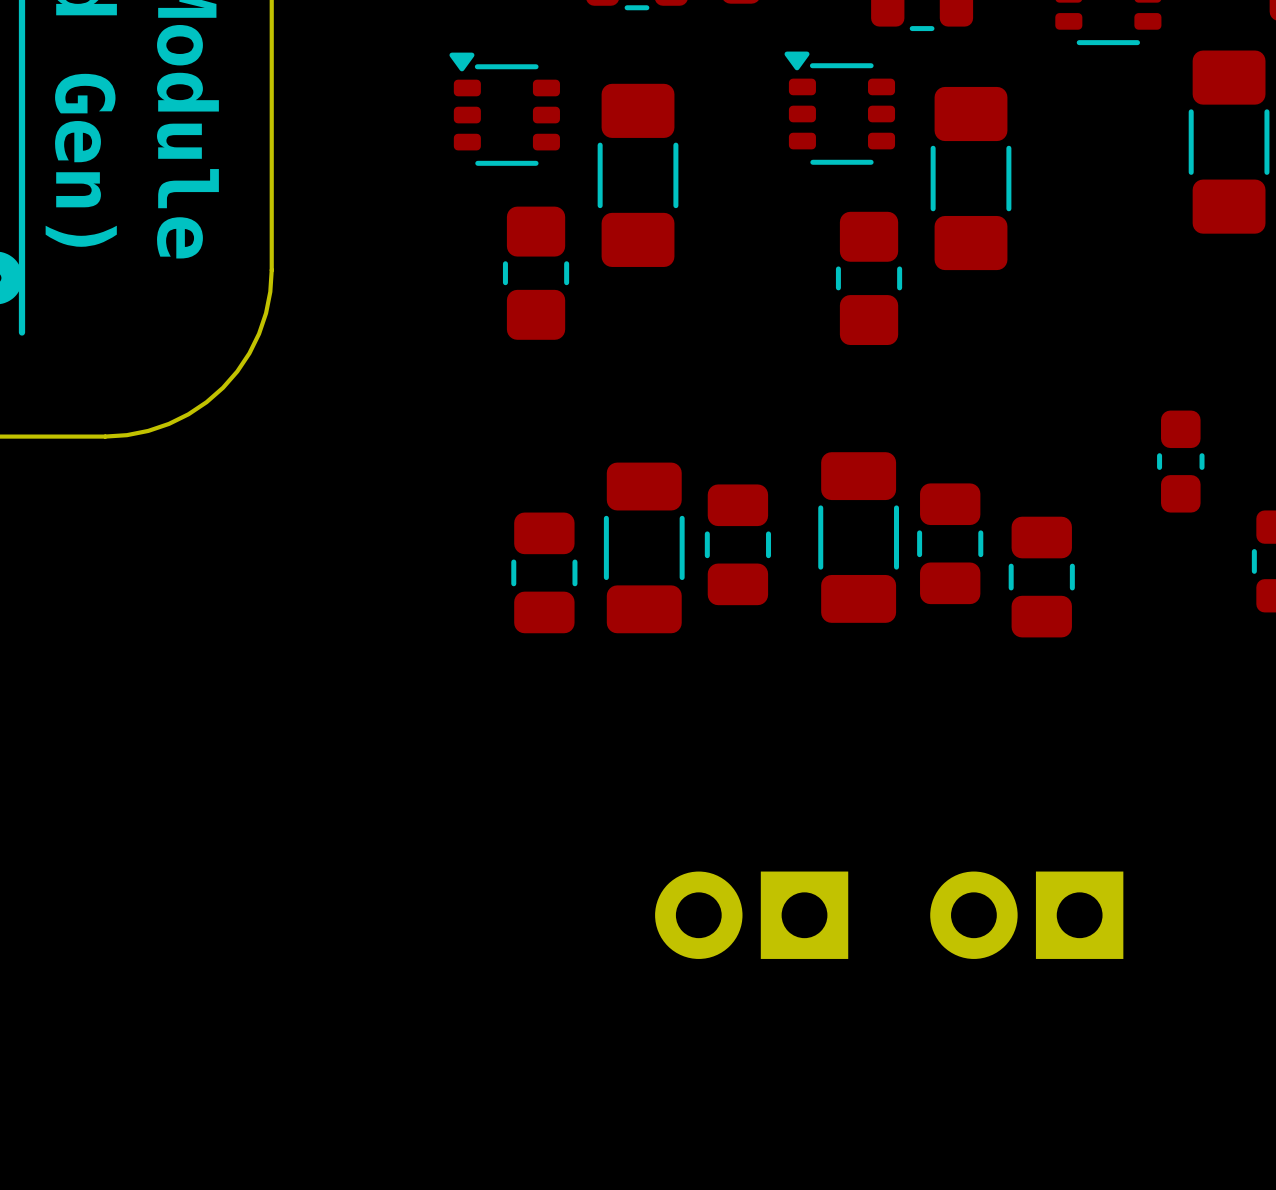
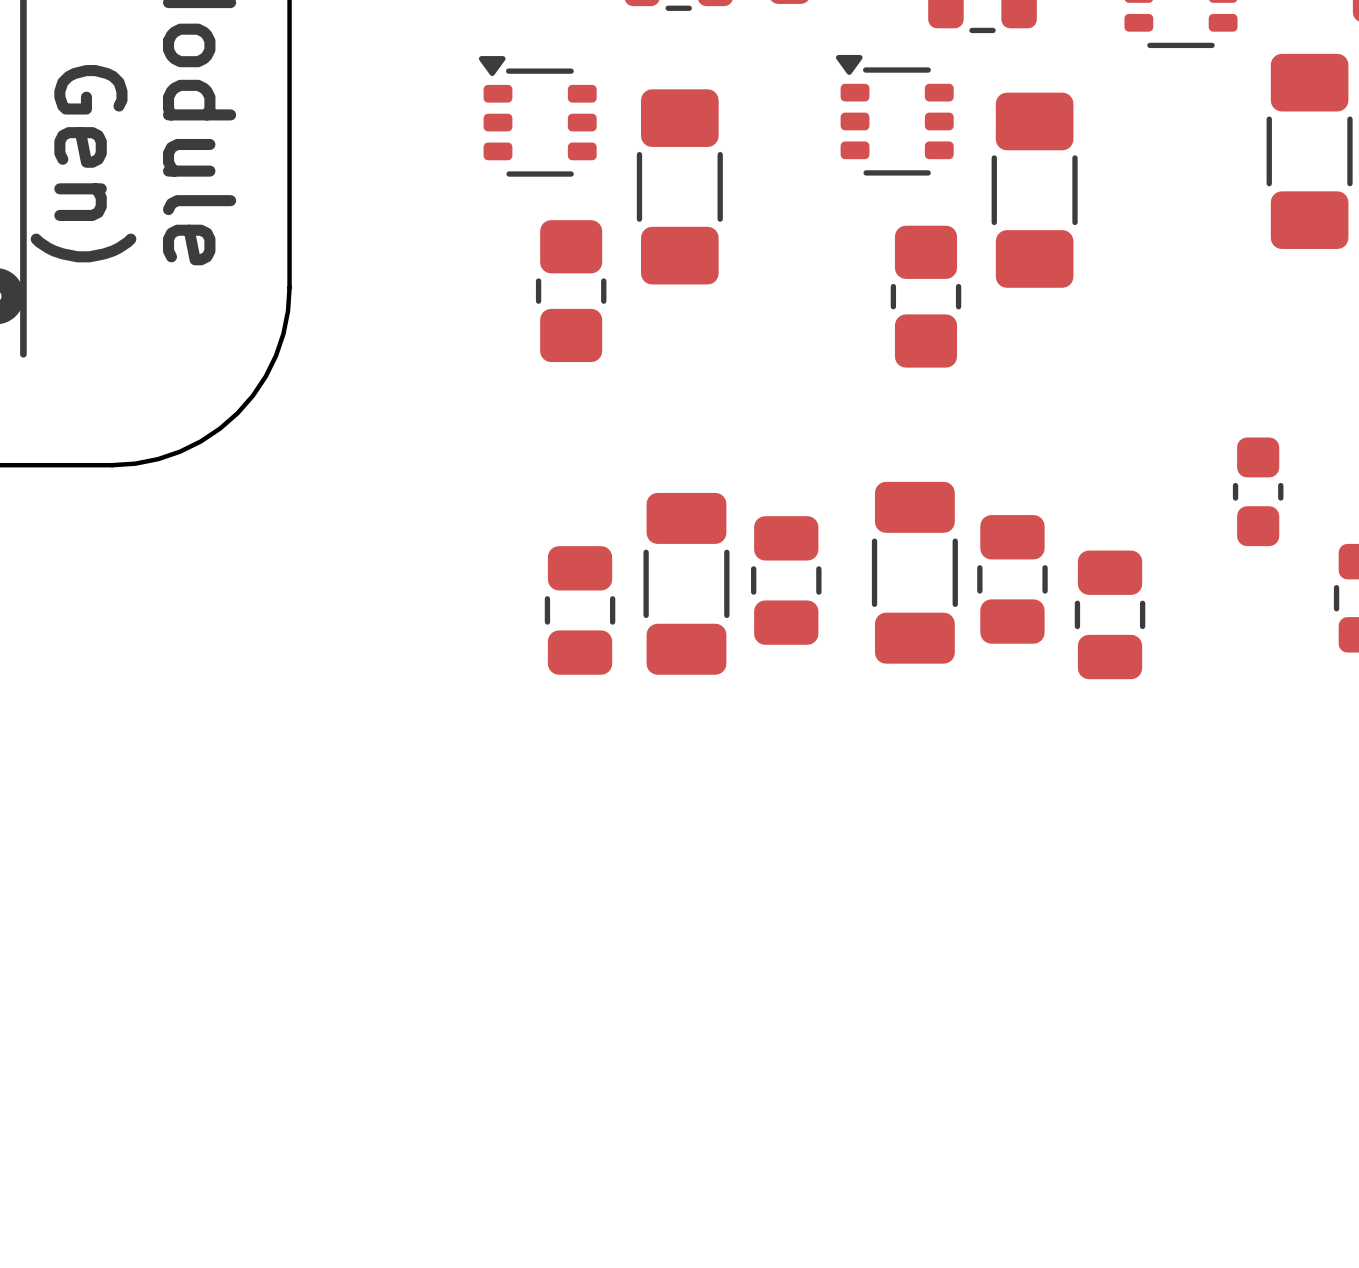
part: (751, 915) -> none
part: (1026, 915) -> none

